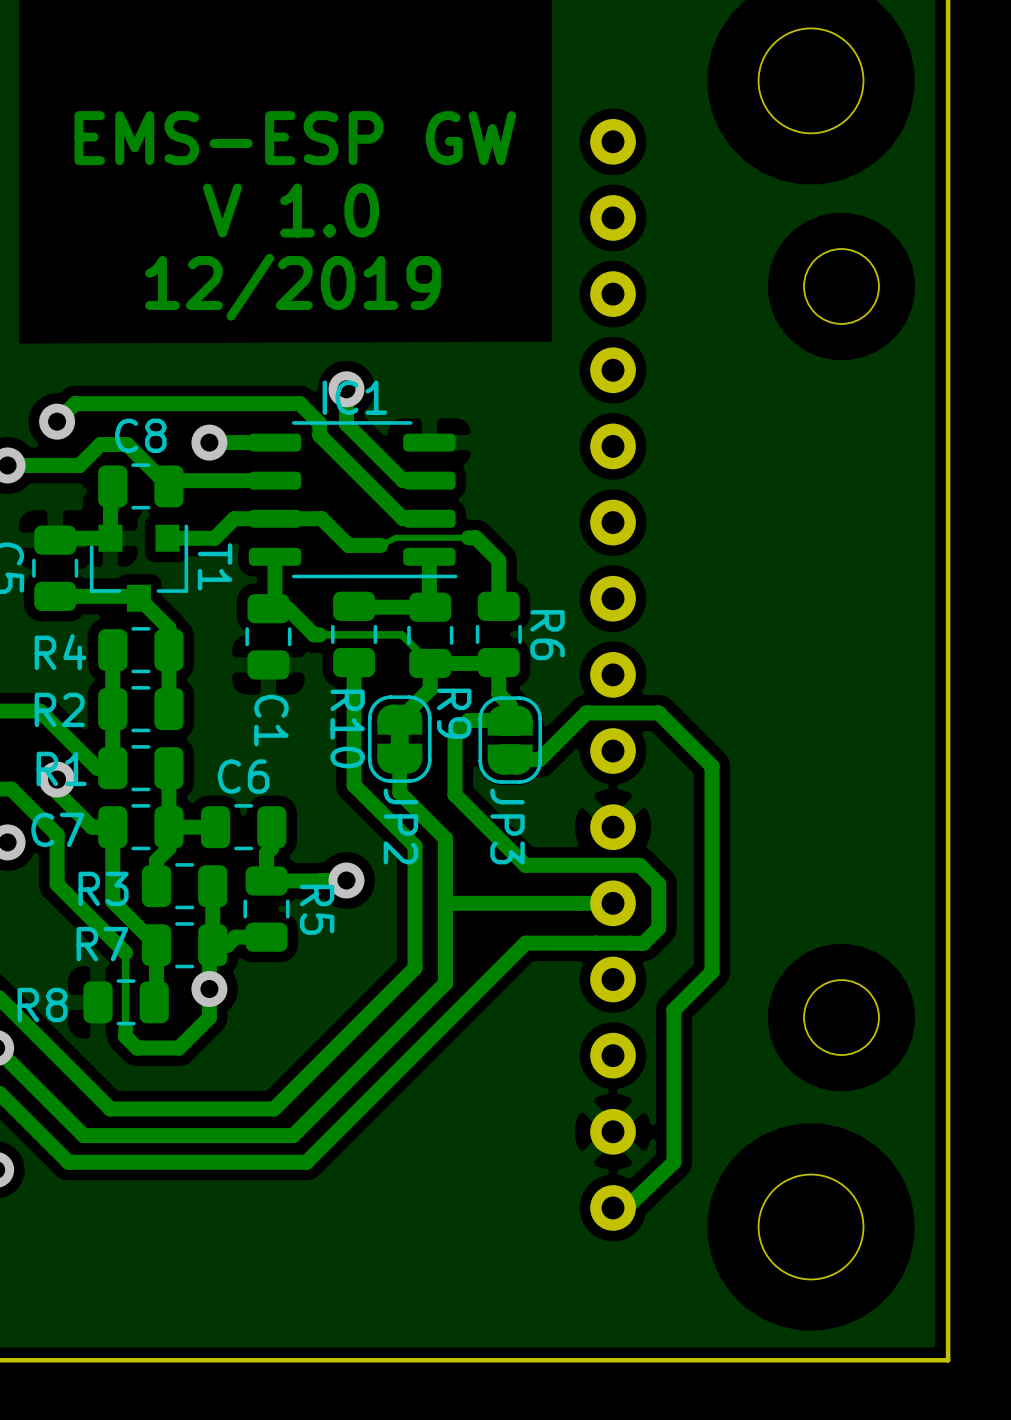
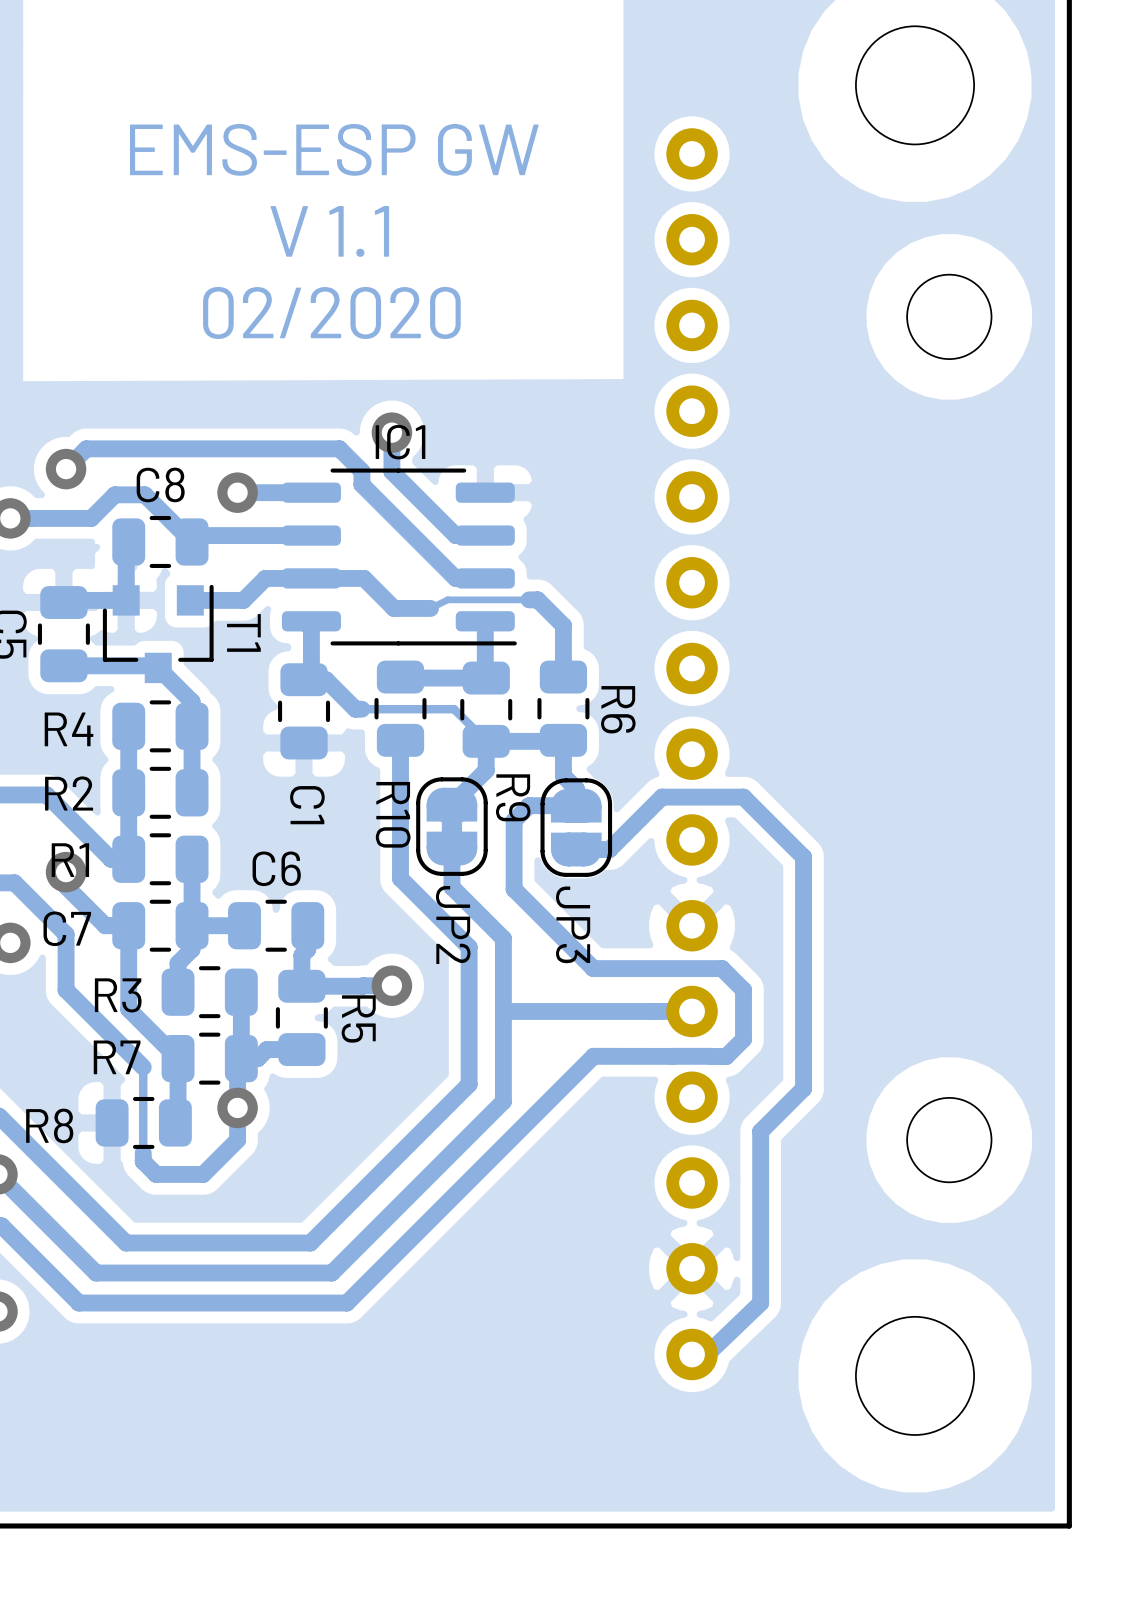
text: V 1.0 (291, 210) -> V 1.1 (329, 231)
text: 12/2019 (293, 287) -> 02/2020 (331, 312)

